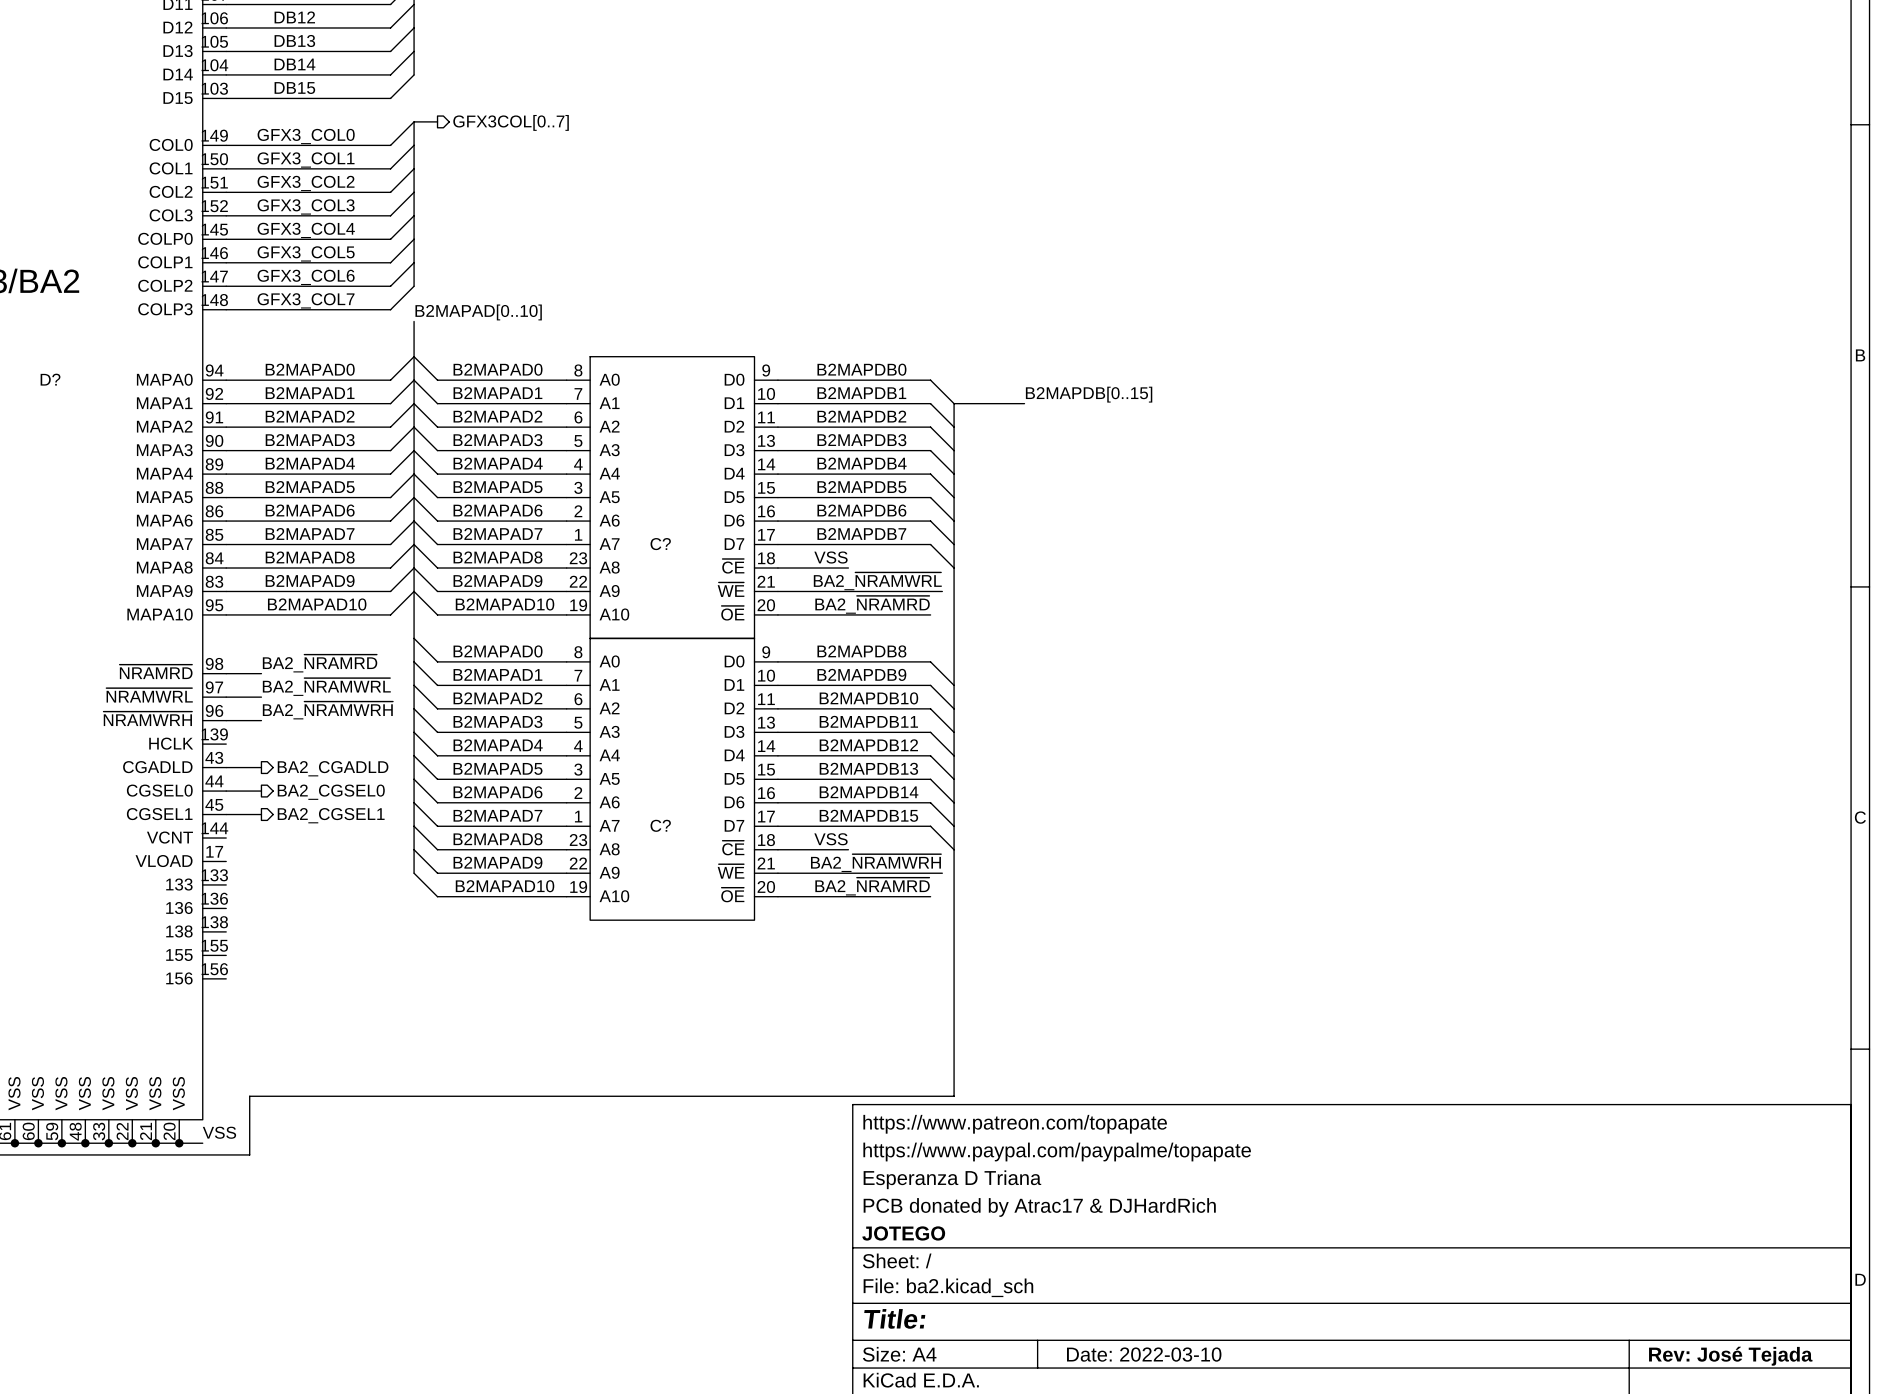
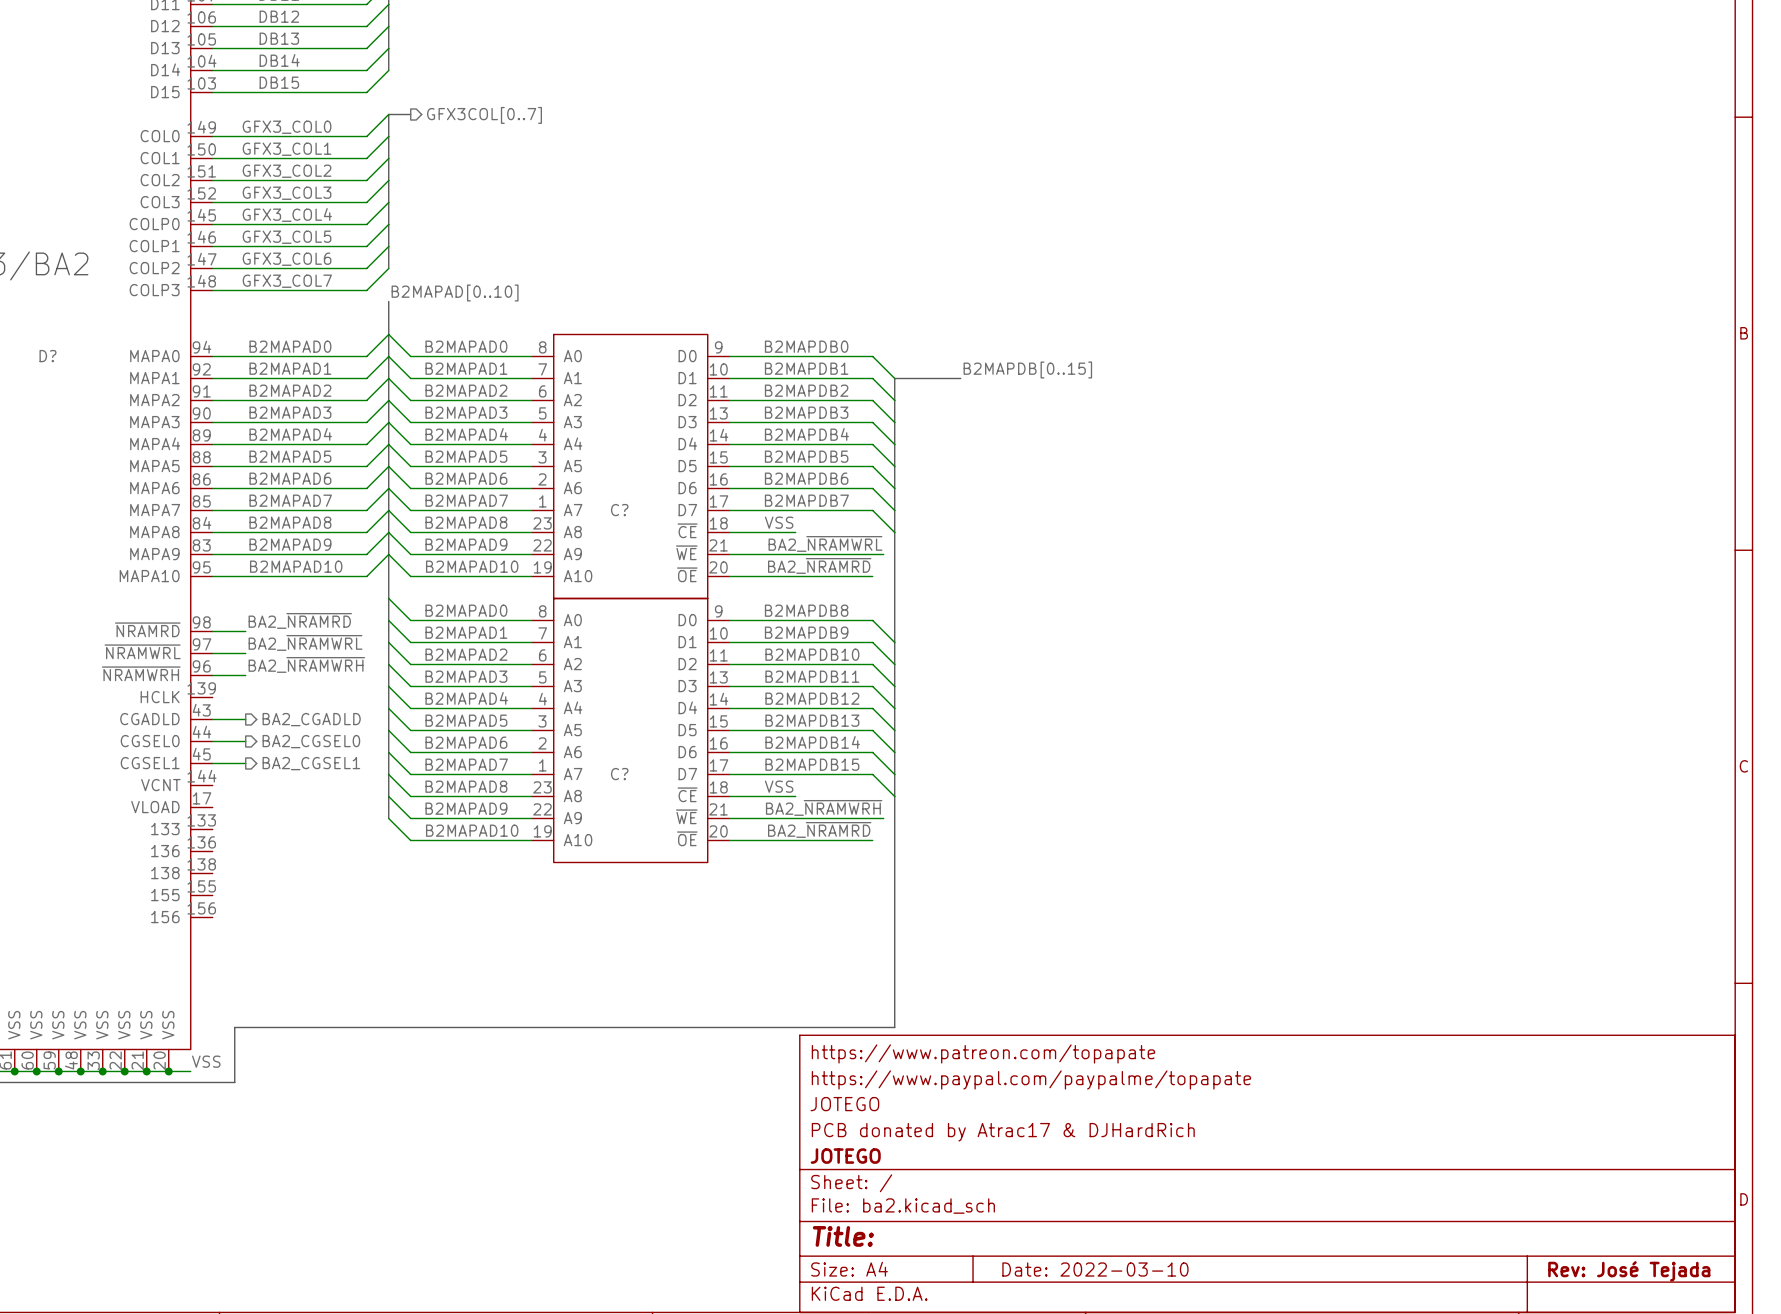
title block: Esperanza D Triana (952, 1179) -> JOTEGO (844, 1104)

